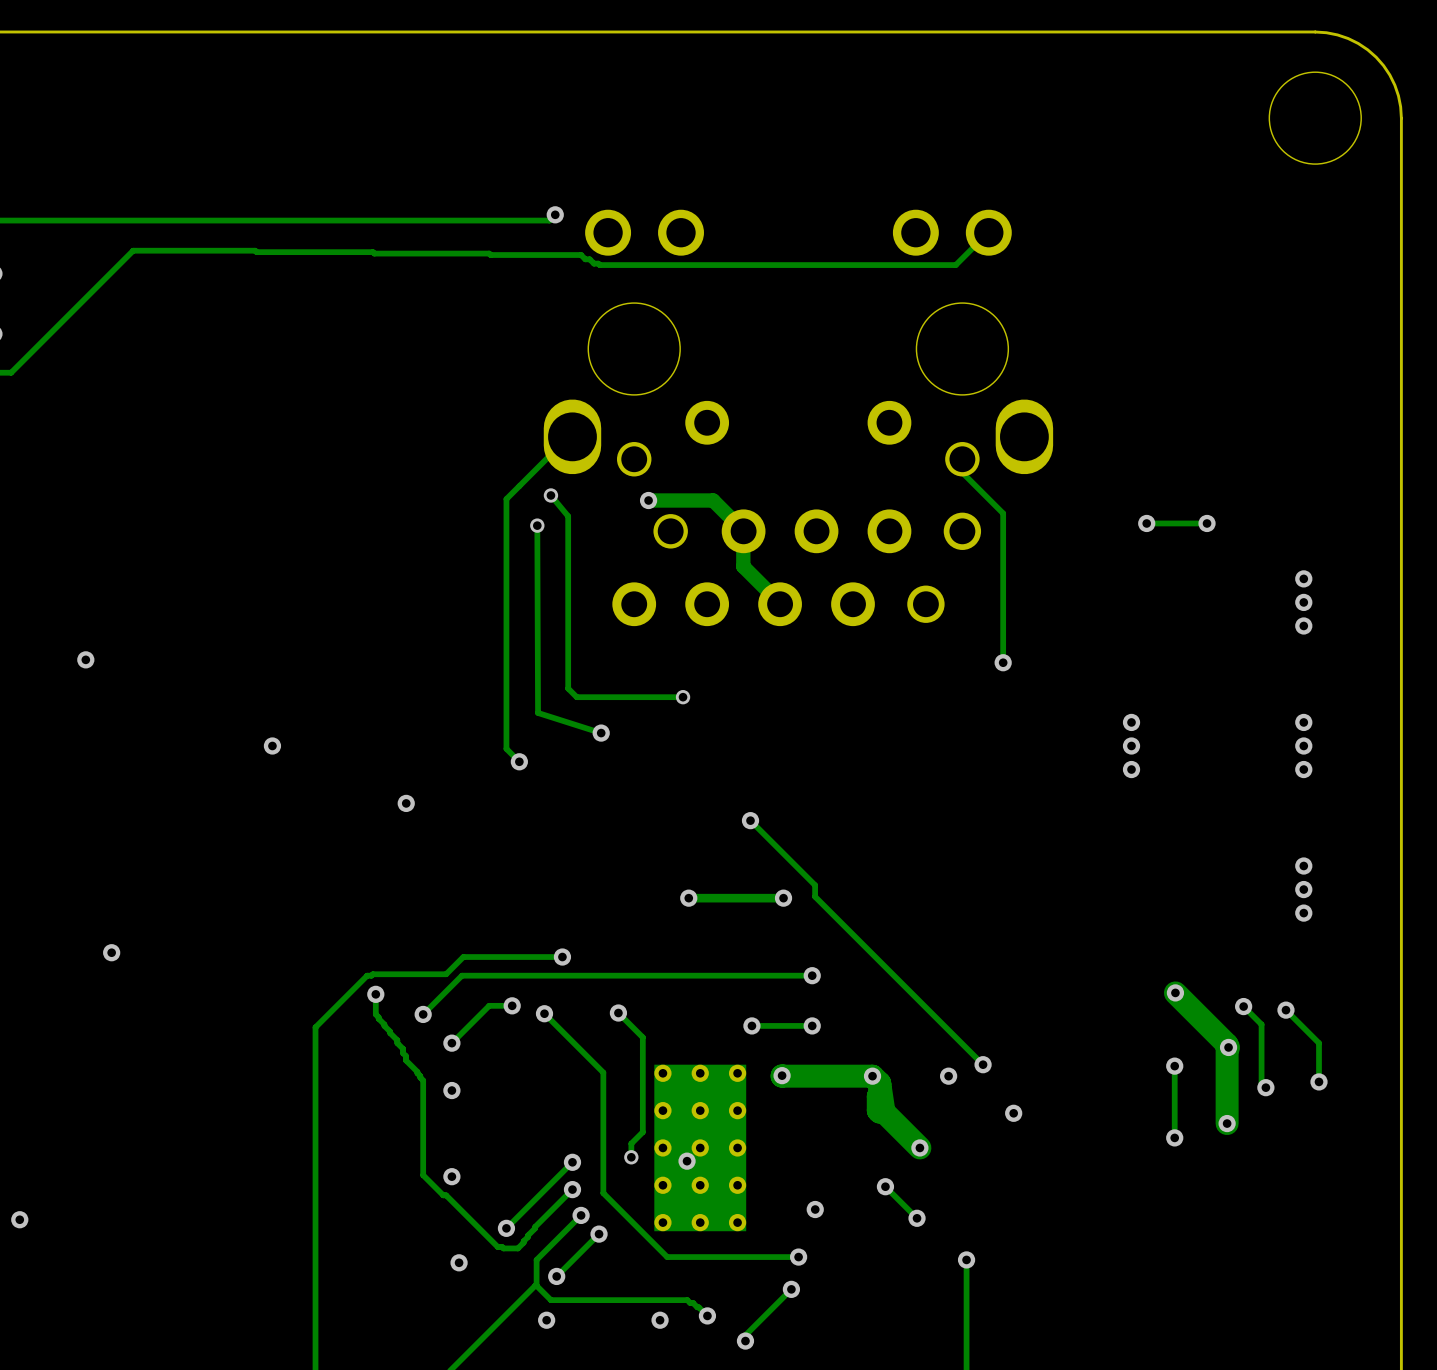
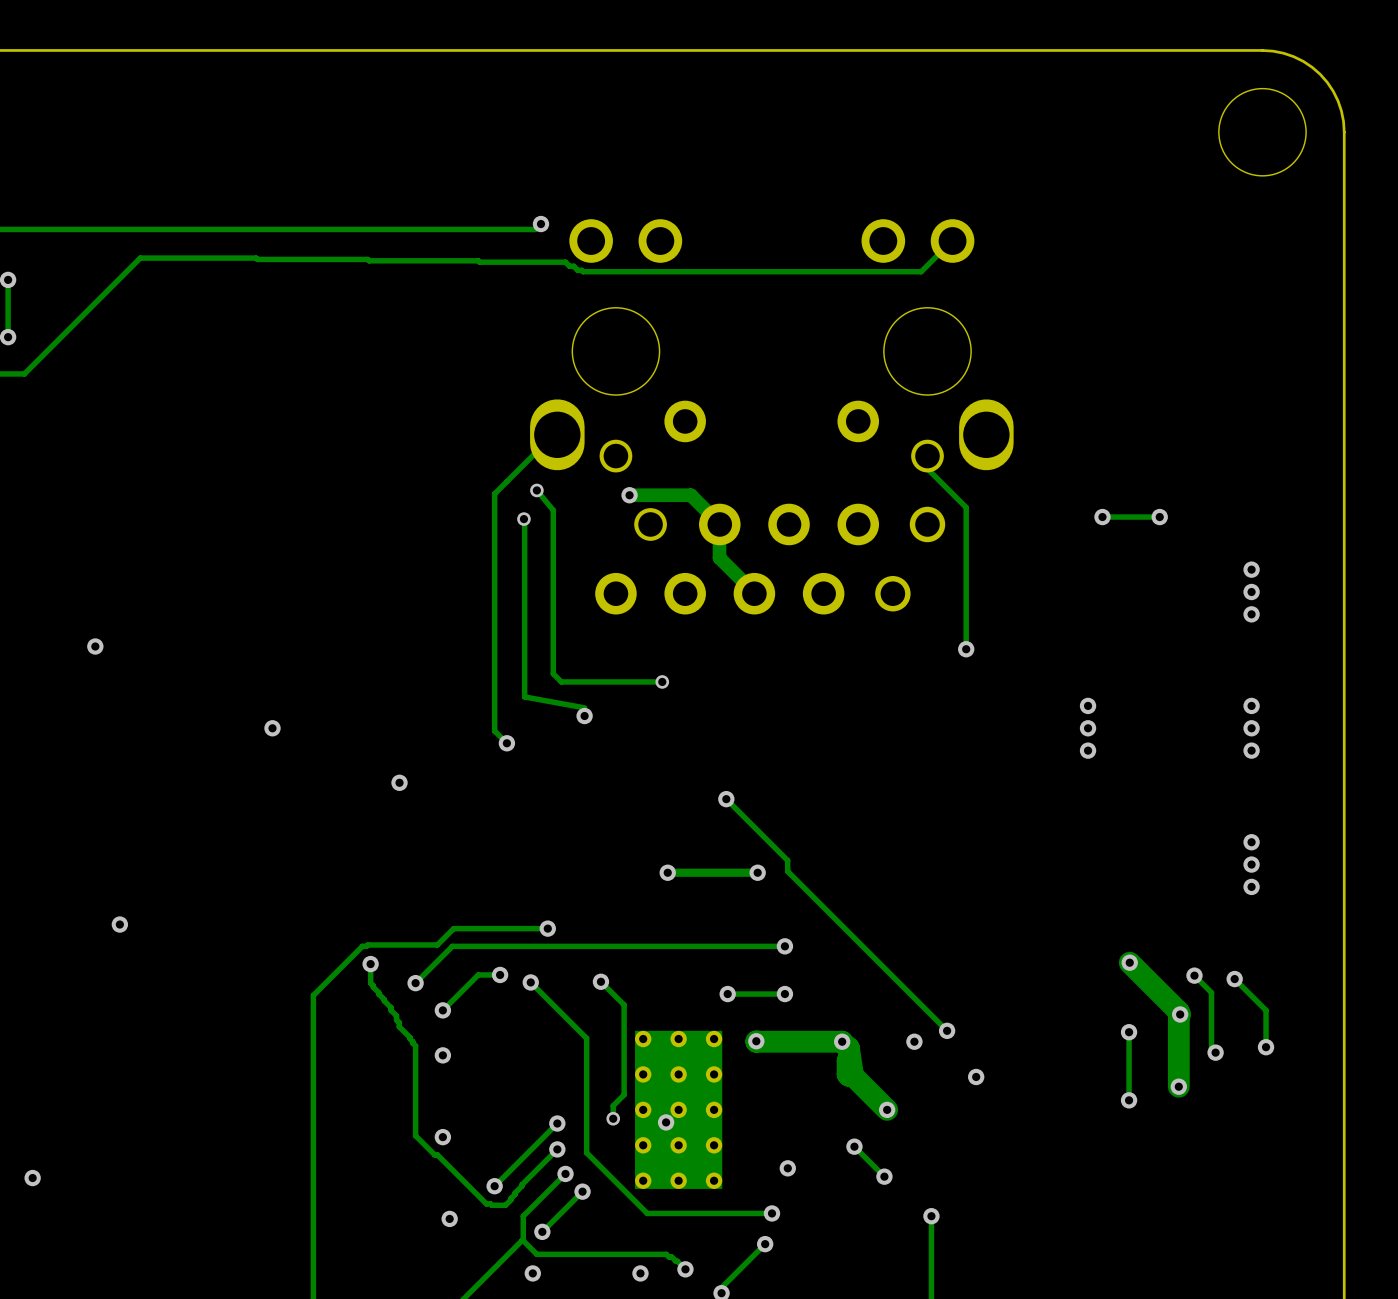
track: none -> (524, 516) (524, 696) (584, 707)
track: (537, 525) (538, 712) (601, 733) -> none

